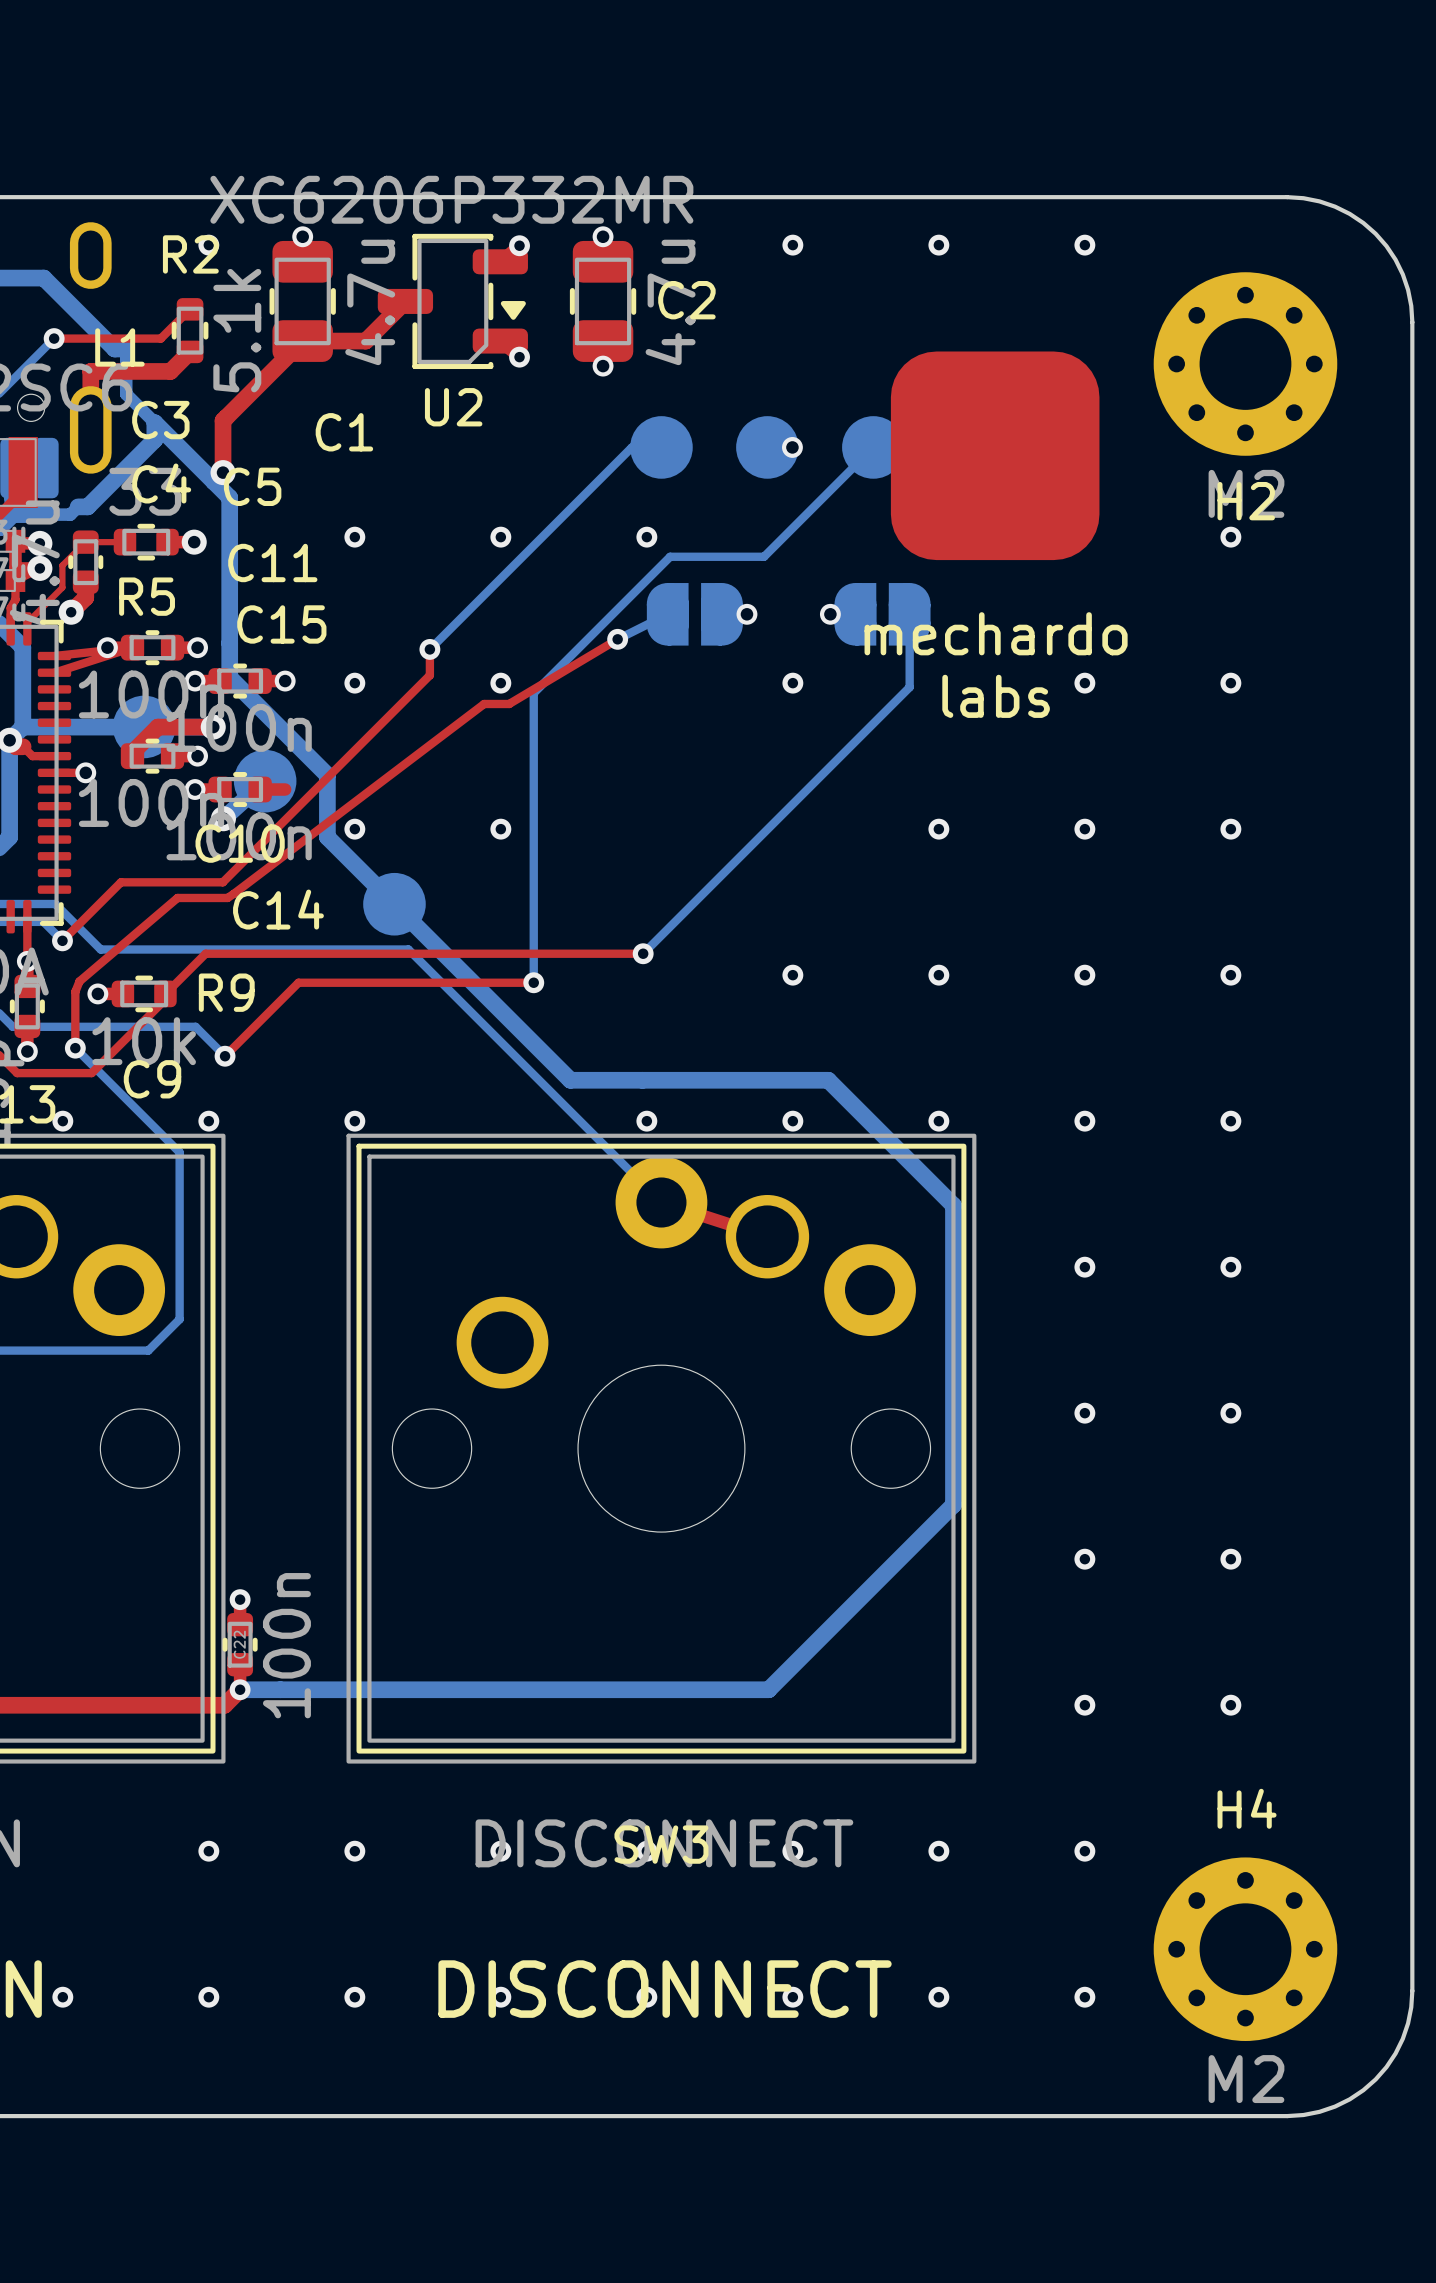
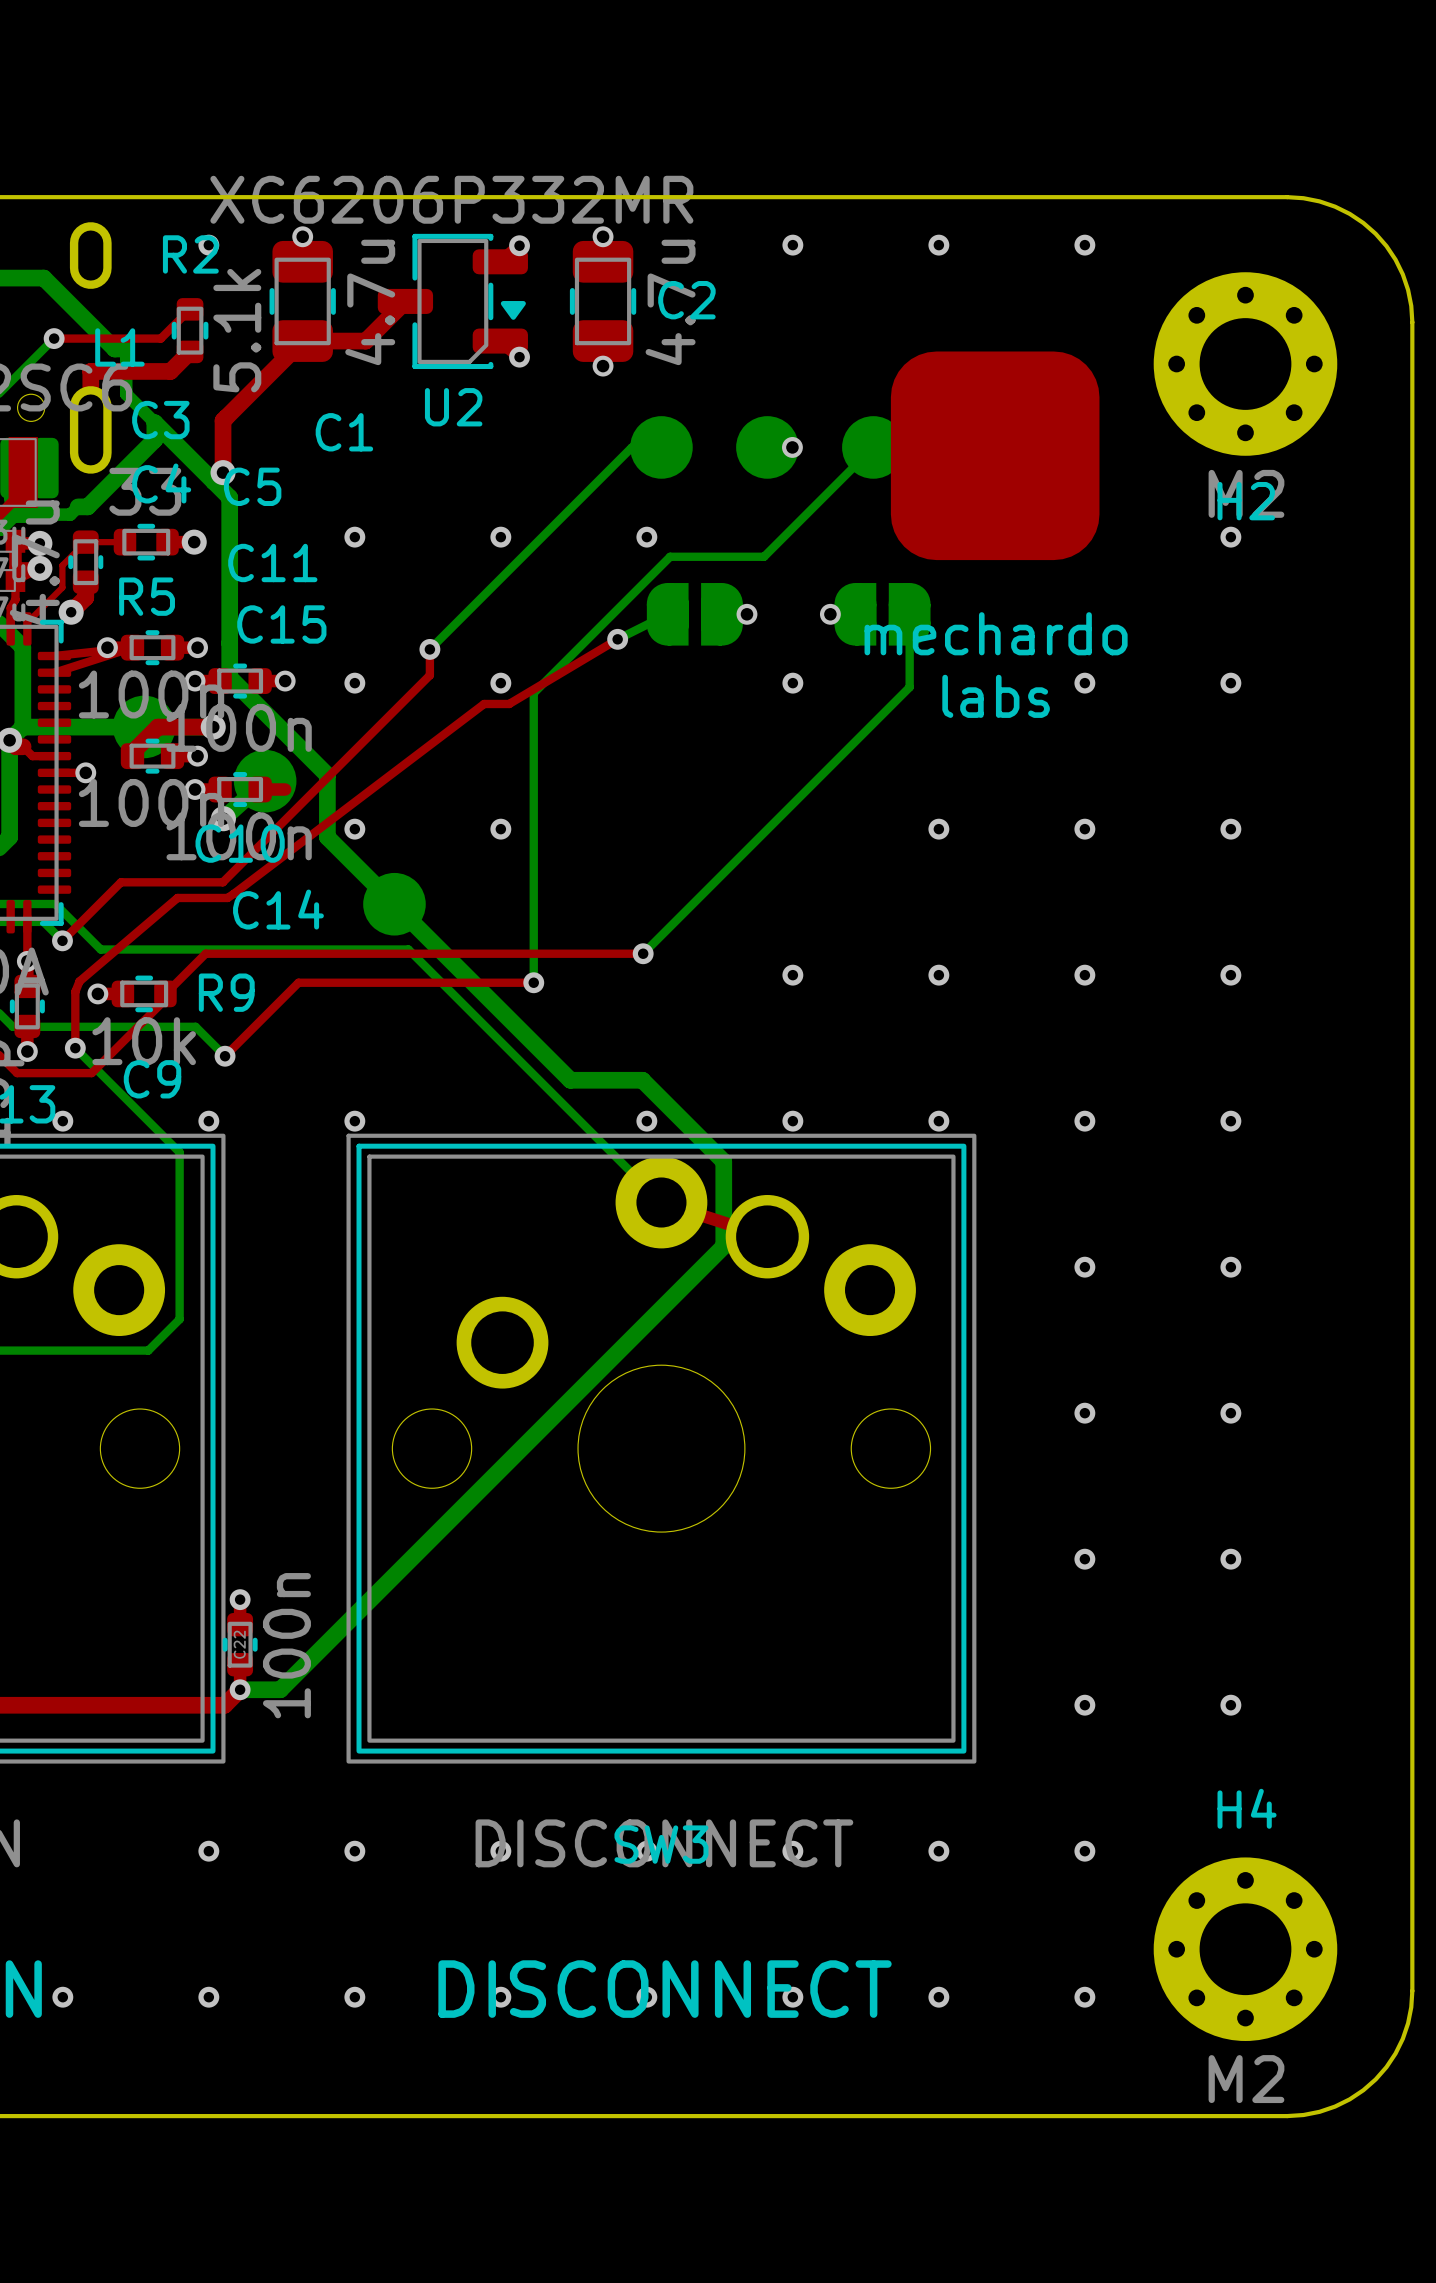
bottom track: (642, 1080) (828, 1080) (953, 1205) (953, 1504) (768, 1689) (280, 1689) -> (642, 1080) (723, 1161) (723, 1246) (280, 1689)

